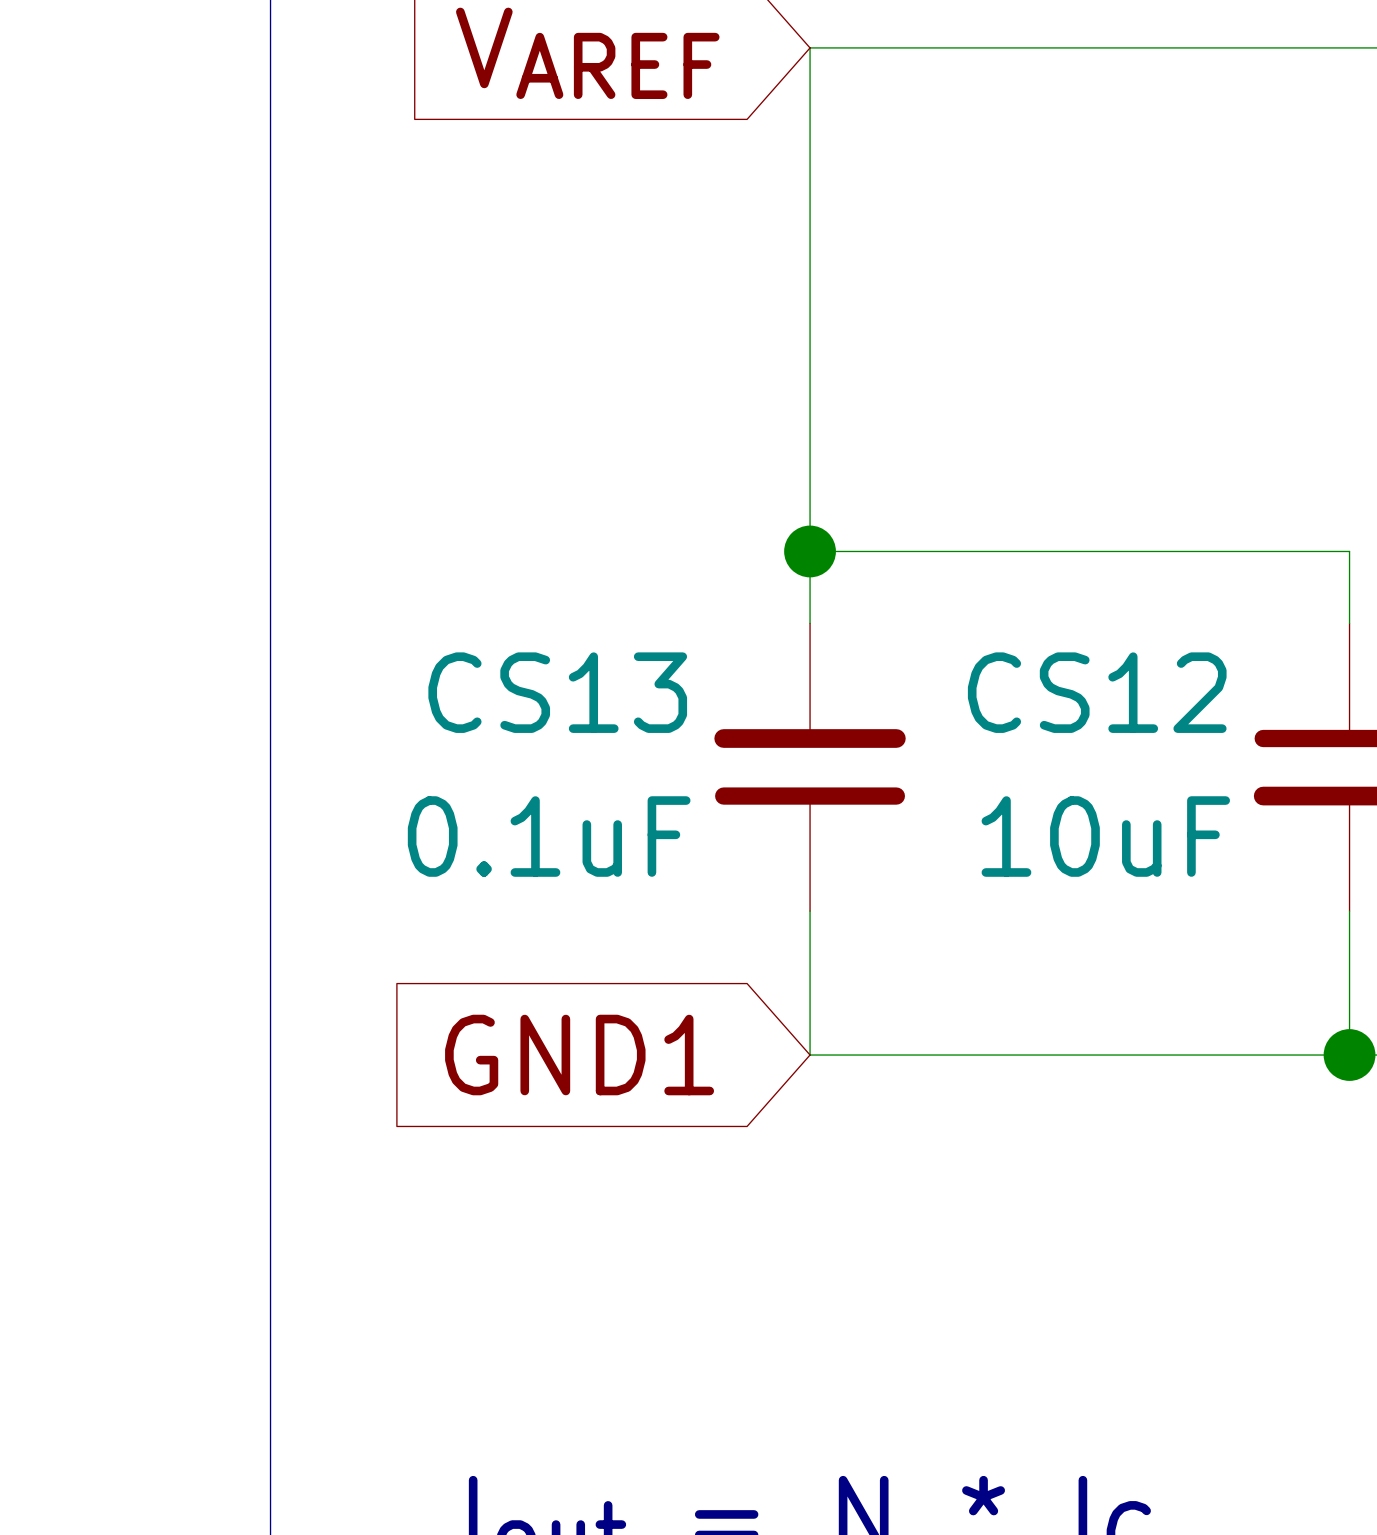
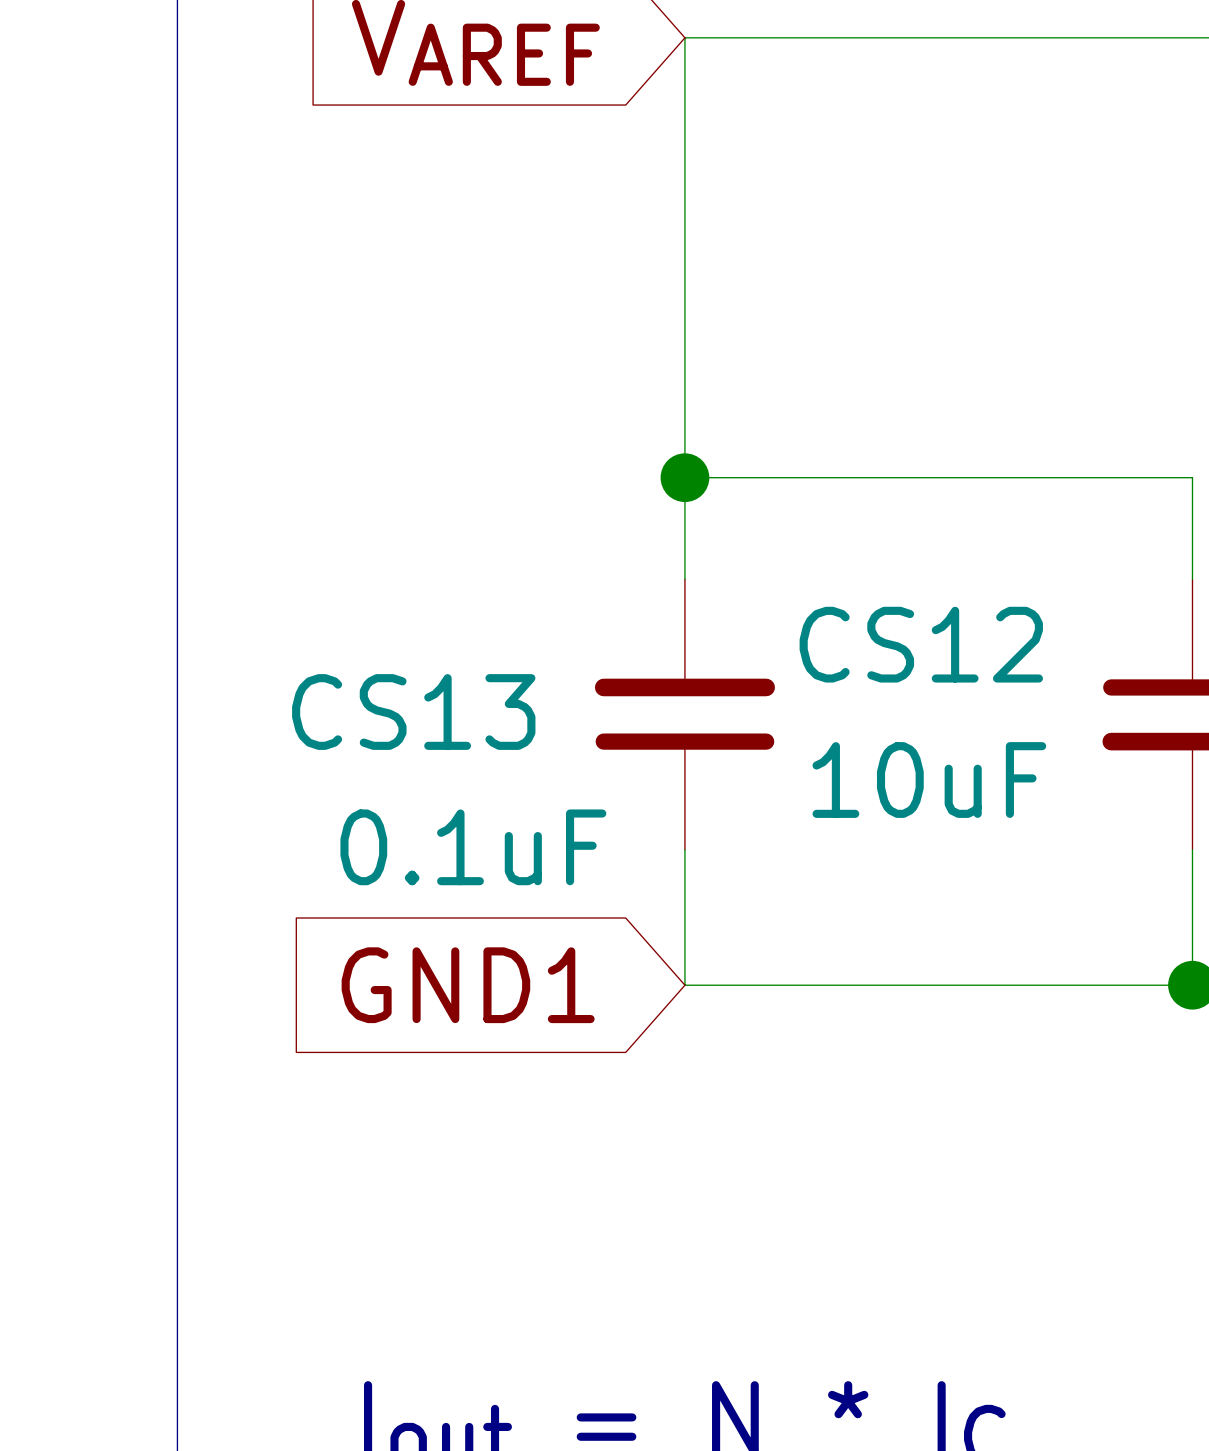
wire: (810, 551) (1349, 551) -> (684, 477) (1192, 477) (1192, 511)
junction position: (810, 551) -> (684, 477)
CS13 name position: CS13 (557, 692) -> CS13 (413, 712)
CS12 name position: CS12 (1097, 692) -> CS12 (921, 644)
CS13 value position: 0.1uF (549, 836) -> 0.1uF (473, 847)
CS12 value position: 10uF (1105, 836) -> 10uF (929, 780)

